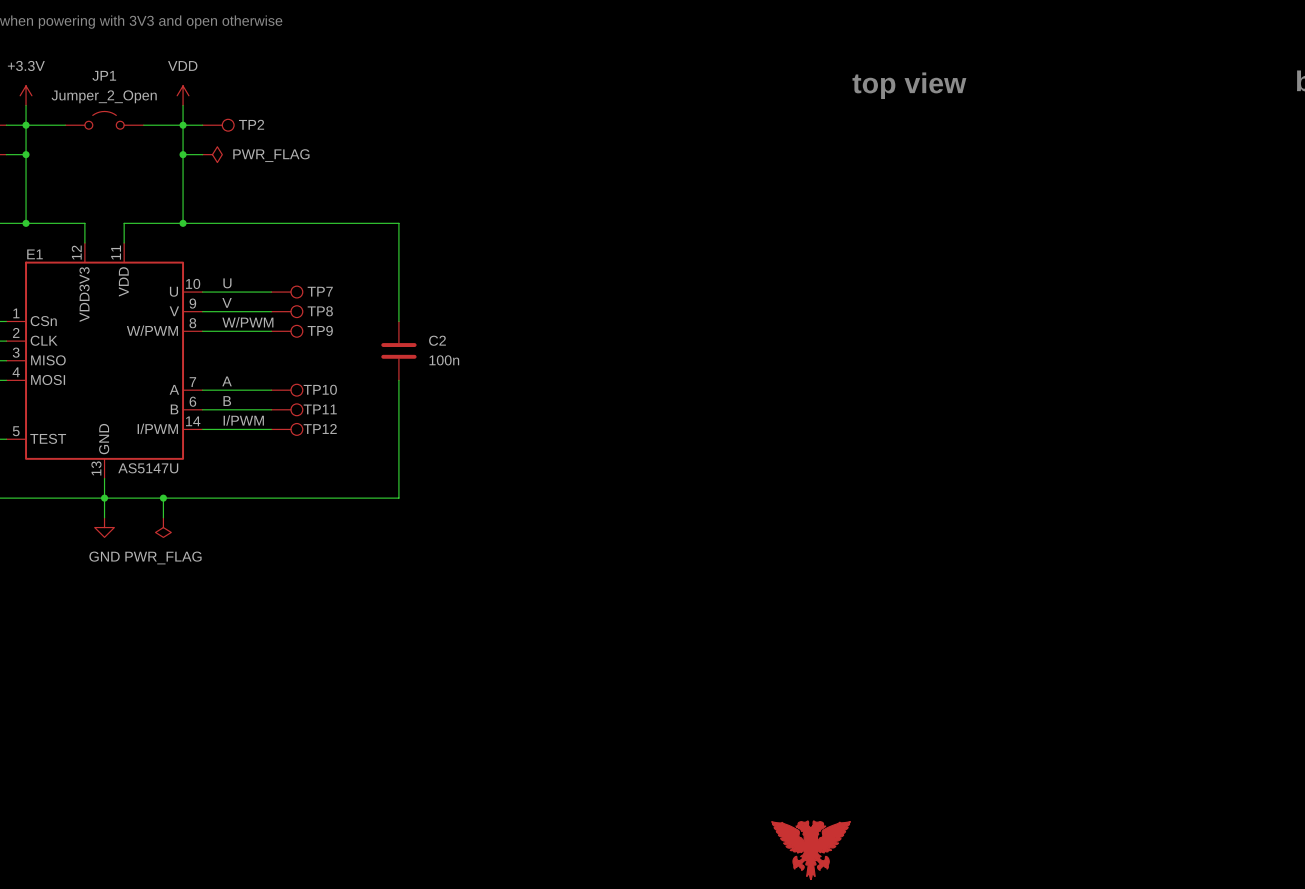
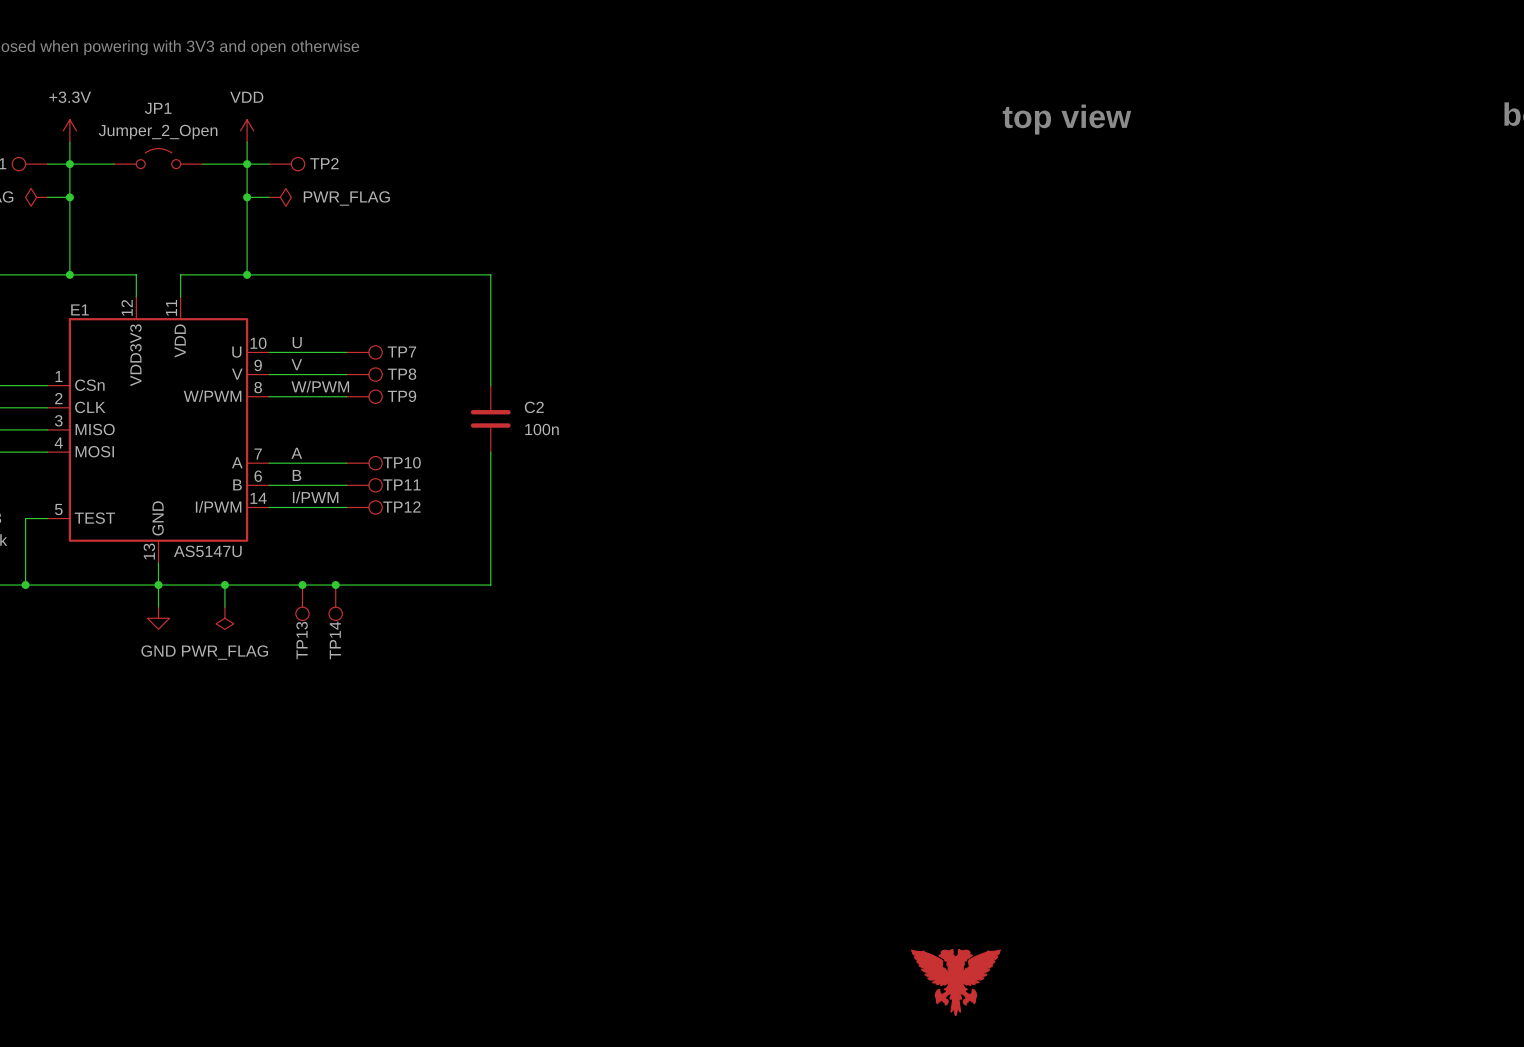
junction: none -> (302, 585)
junction: none -> (335, 585)
TP13: none -> (302, 602)
TP14: none -> (335, 602)

